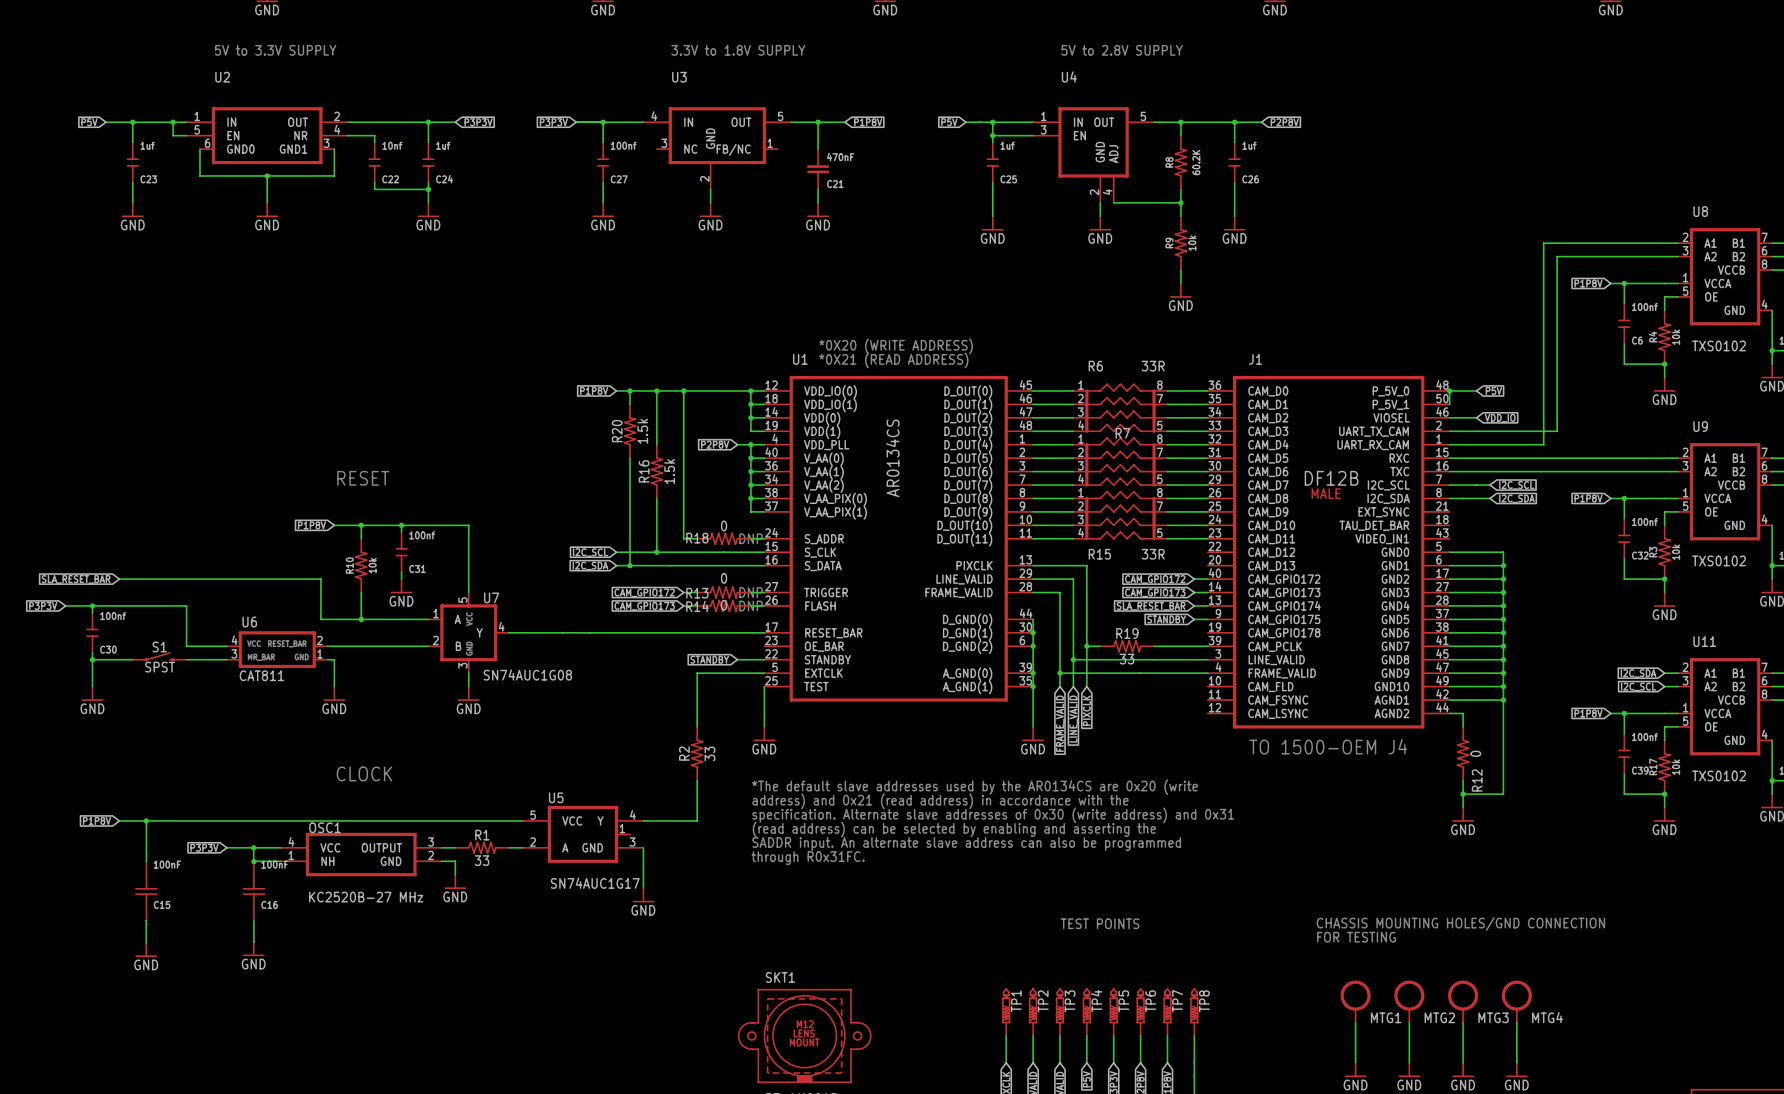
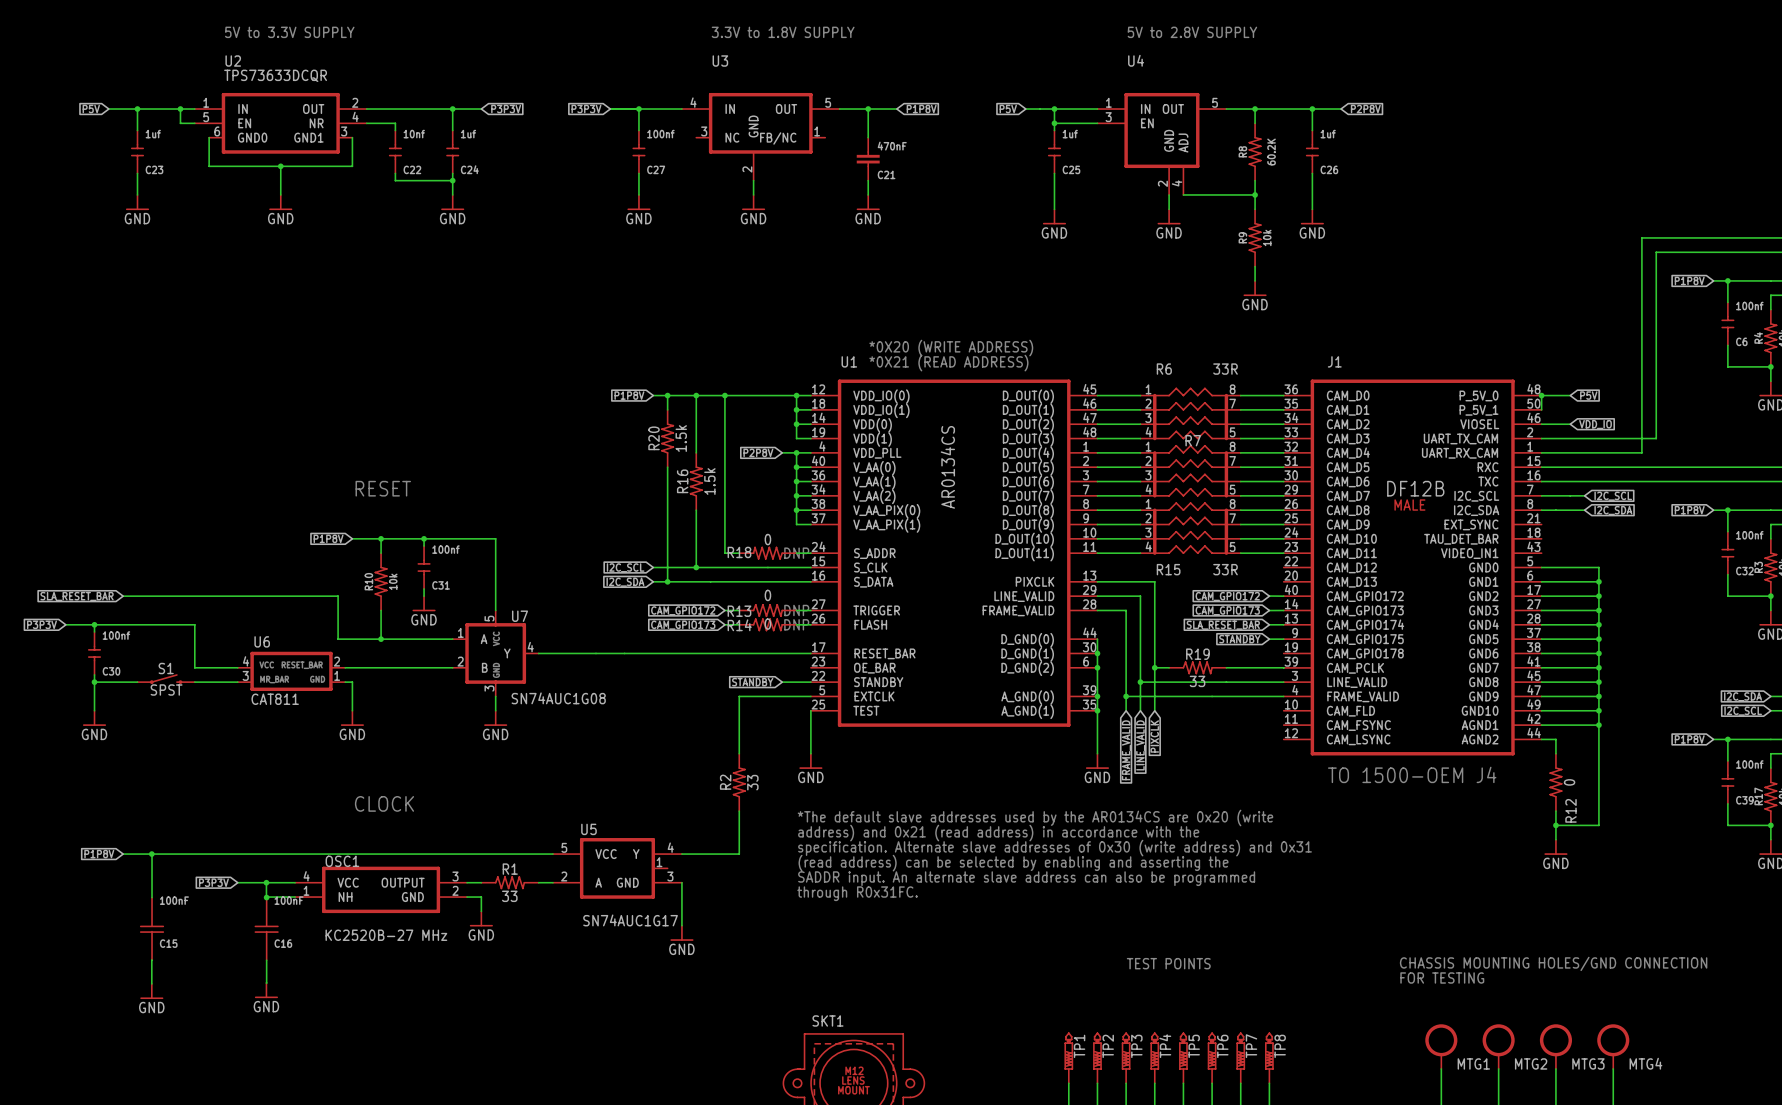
U2 value: none -> TPS73633DCQR (275, 75)

